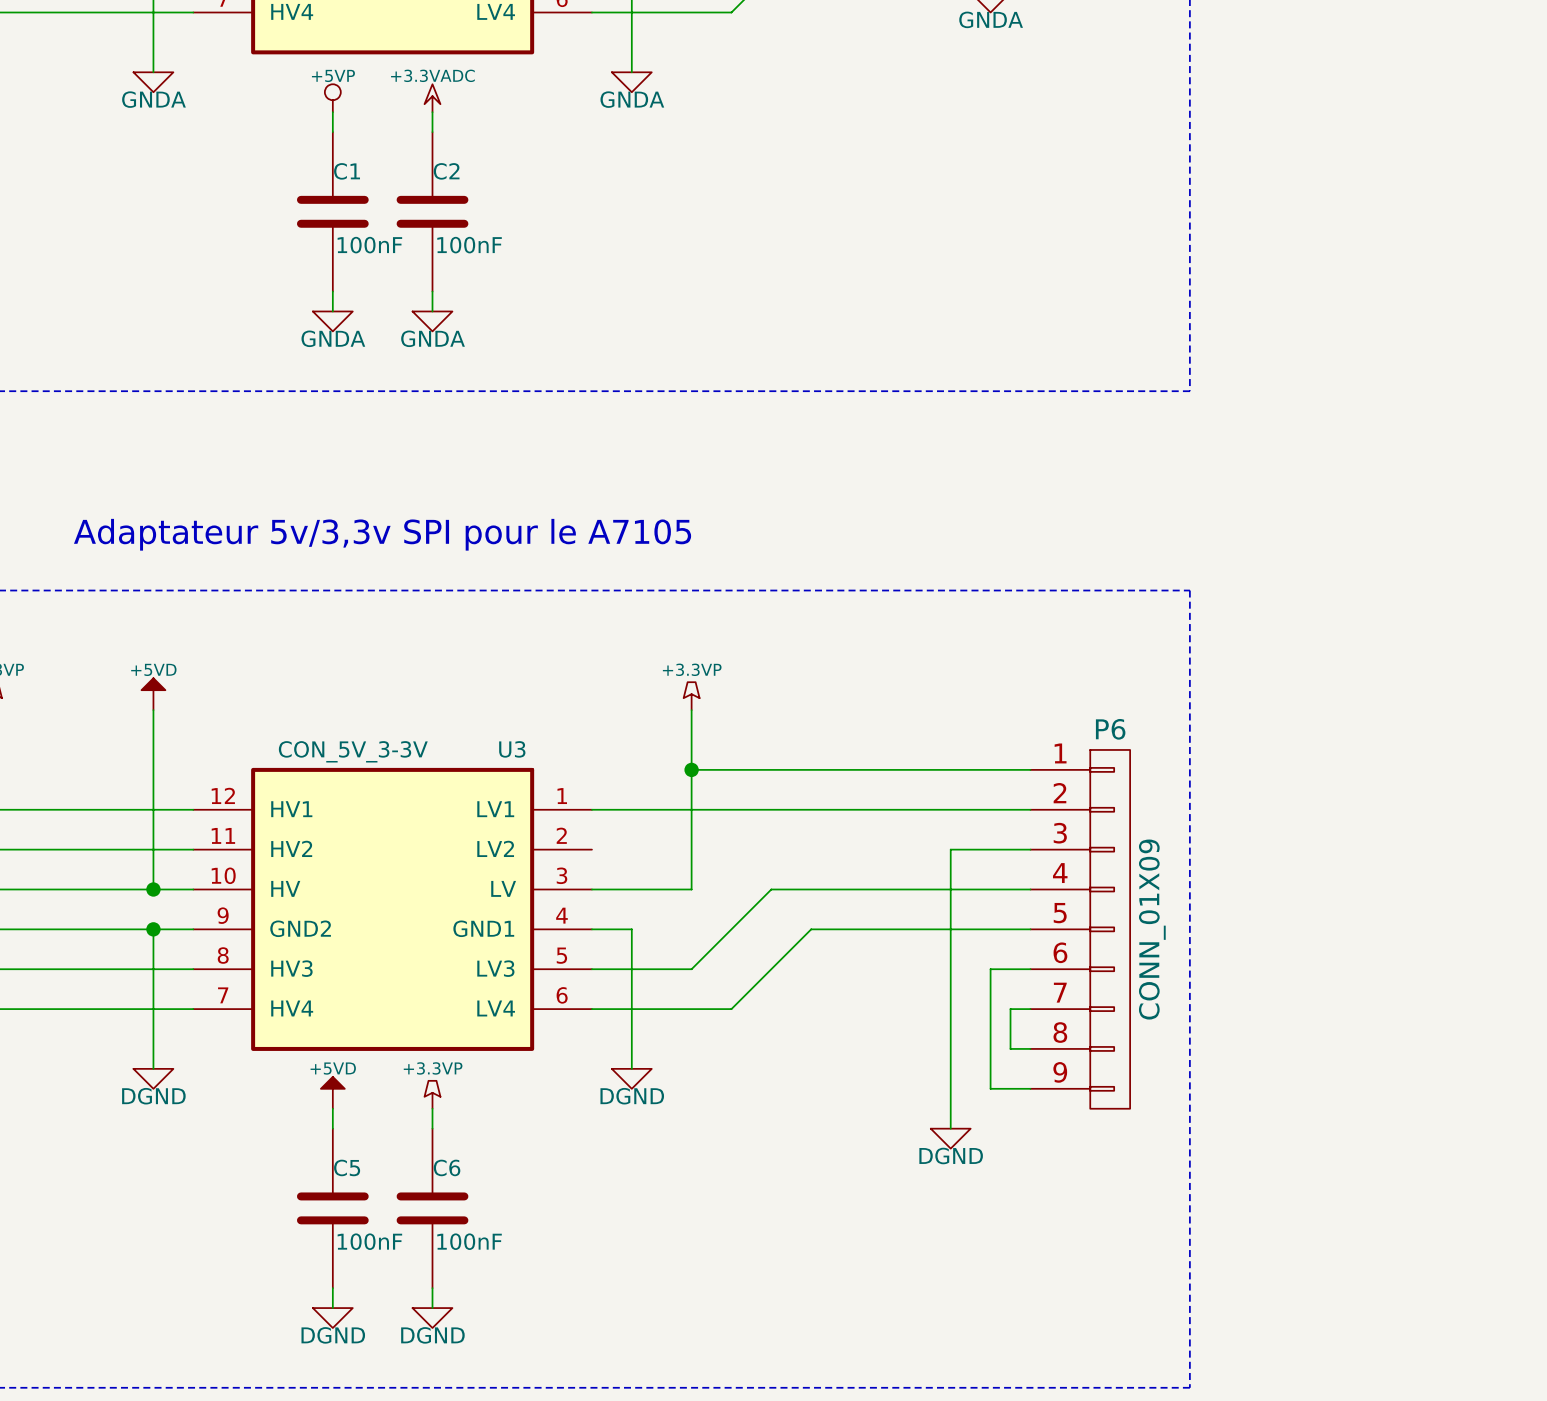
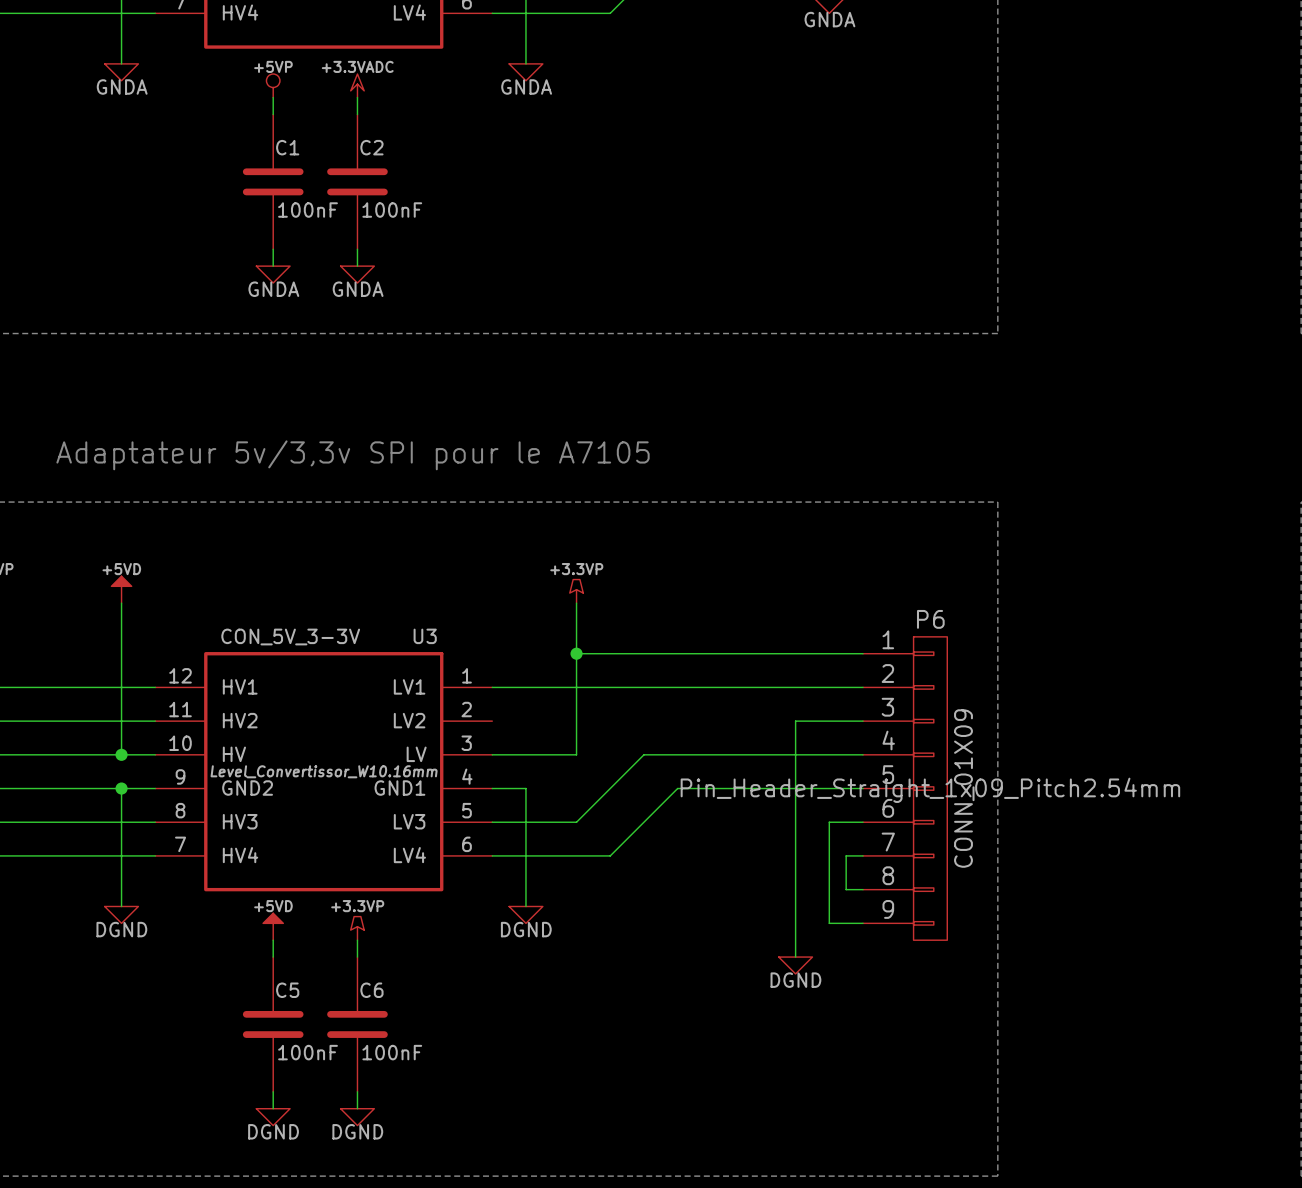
U3 text: none -> Level_Convertissor_W10.16mm (324, 771)
P6 text: none -> Pin_Header_Straight_1x09_Pitch2.54mm (930, 790)

